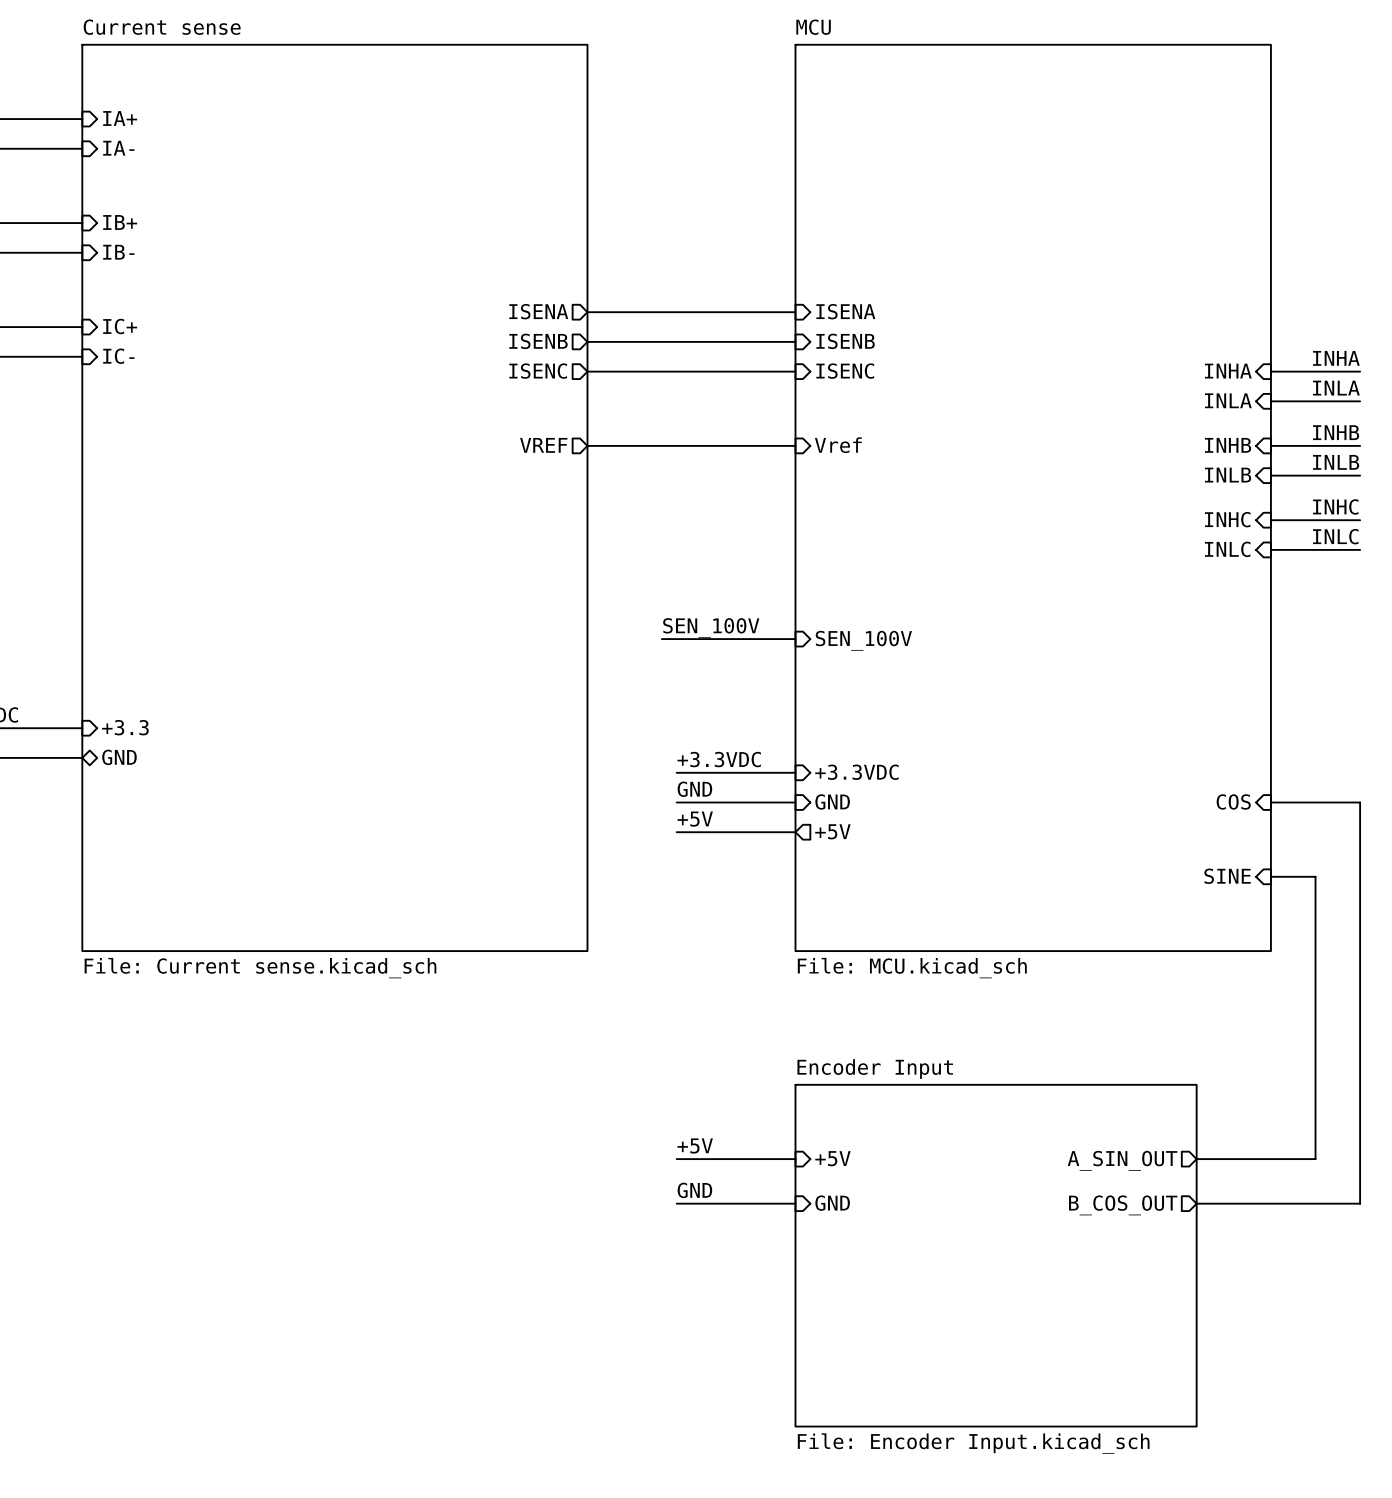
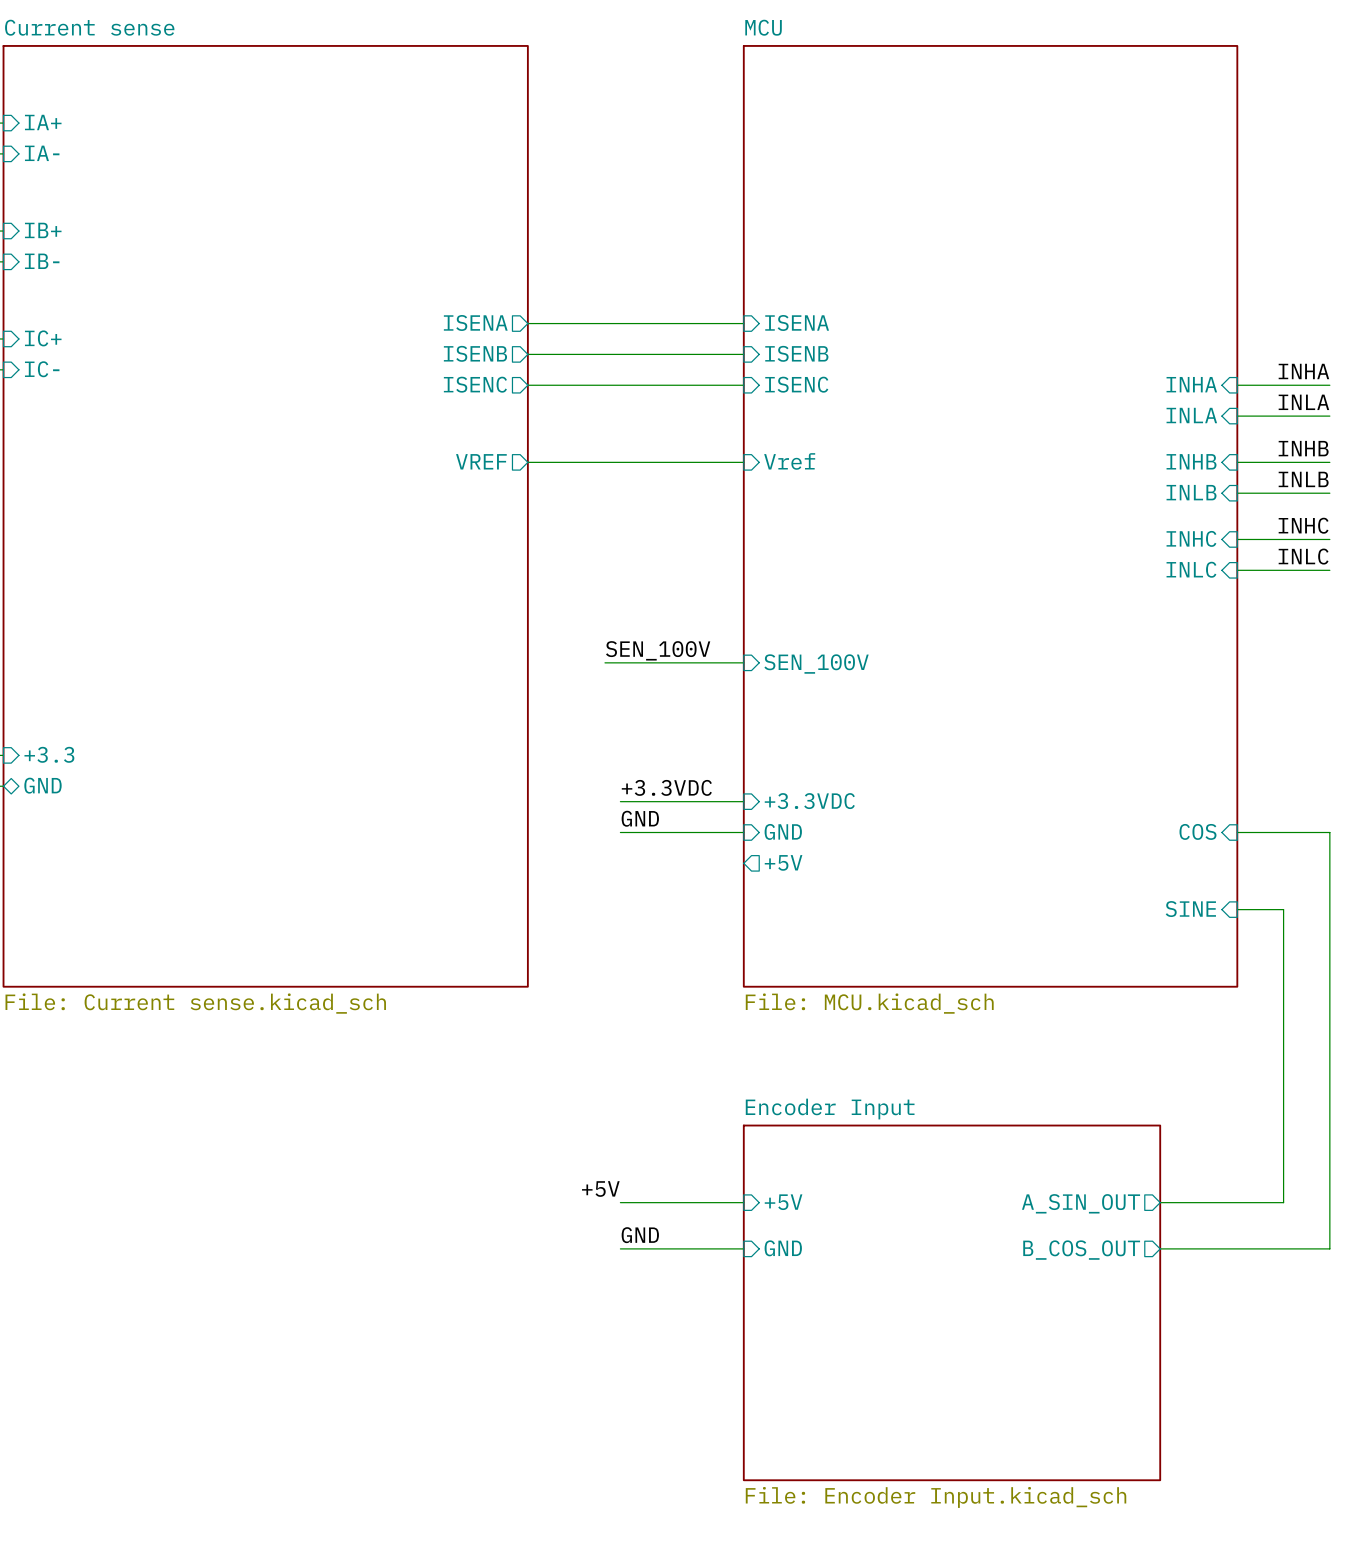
label: +5V (695, 819) -> none
wire: (676, 832) (795, 832) -> none
label position: +5V (695, 1145) -> +5V (600, 1189)

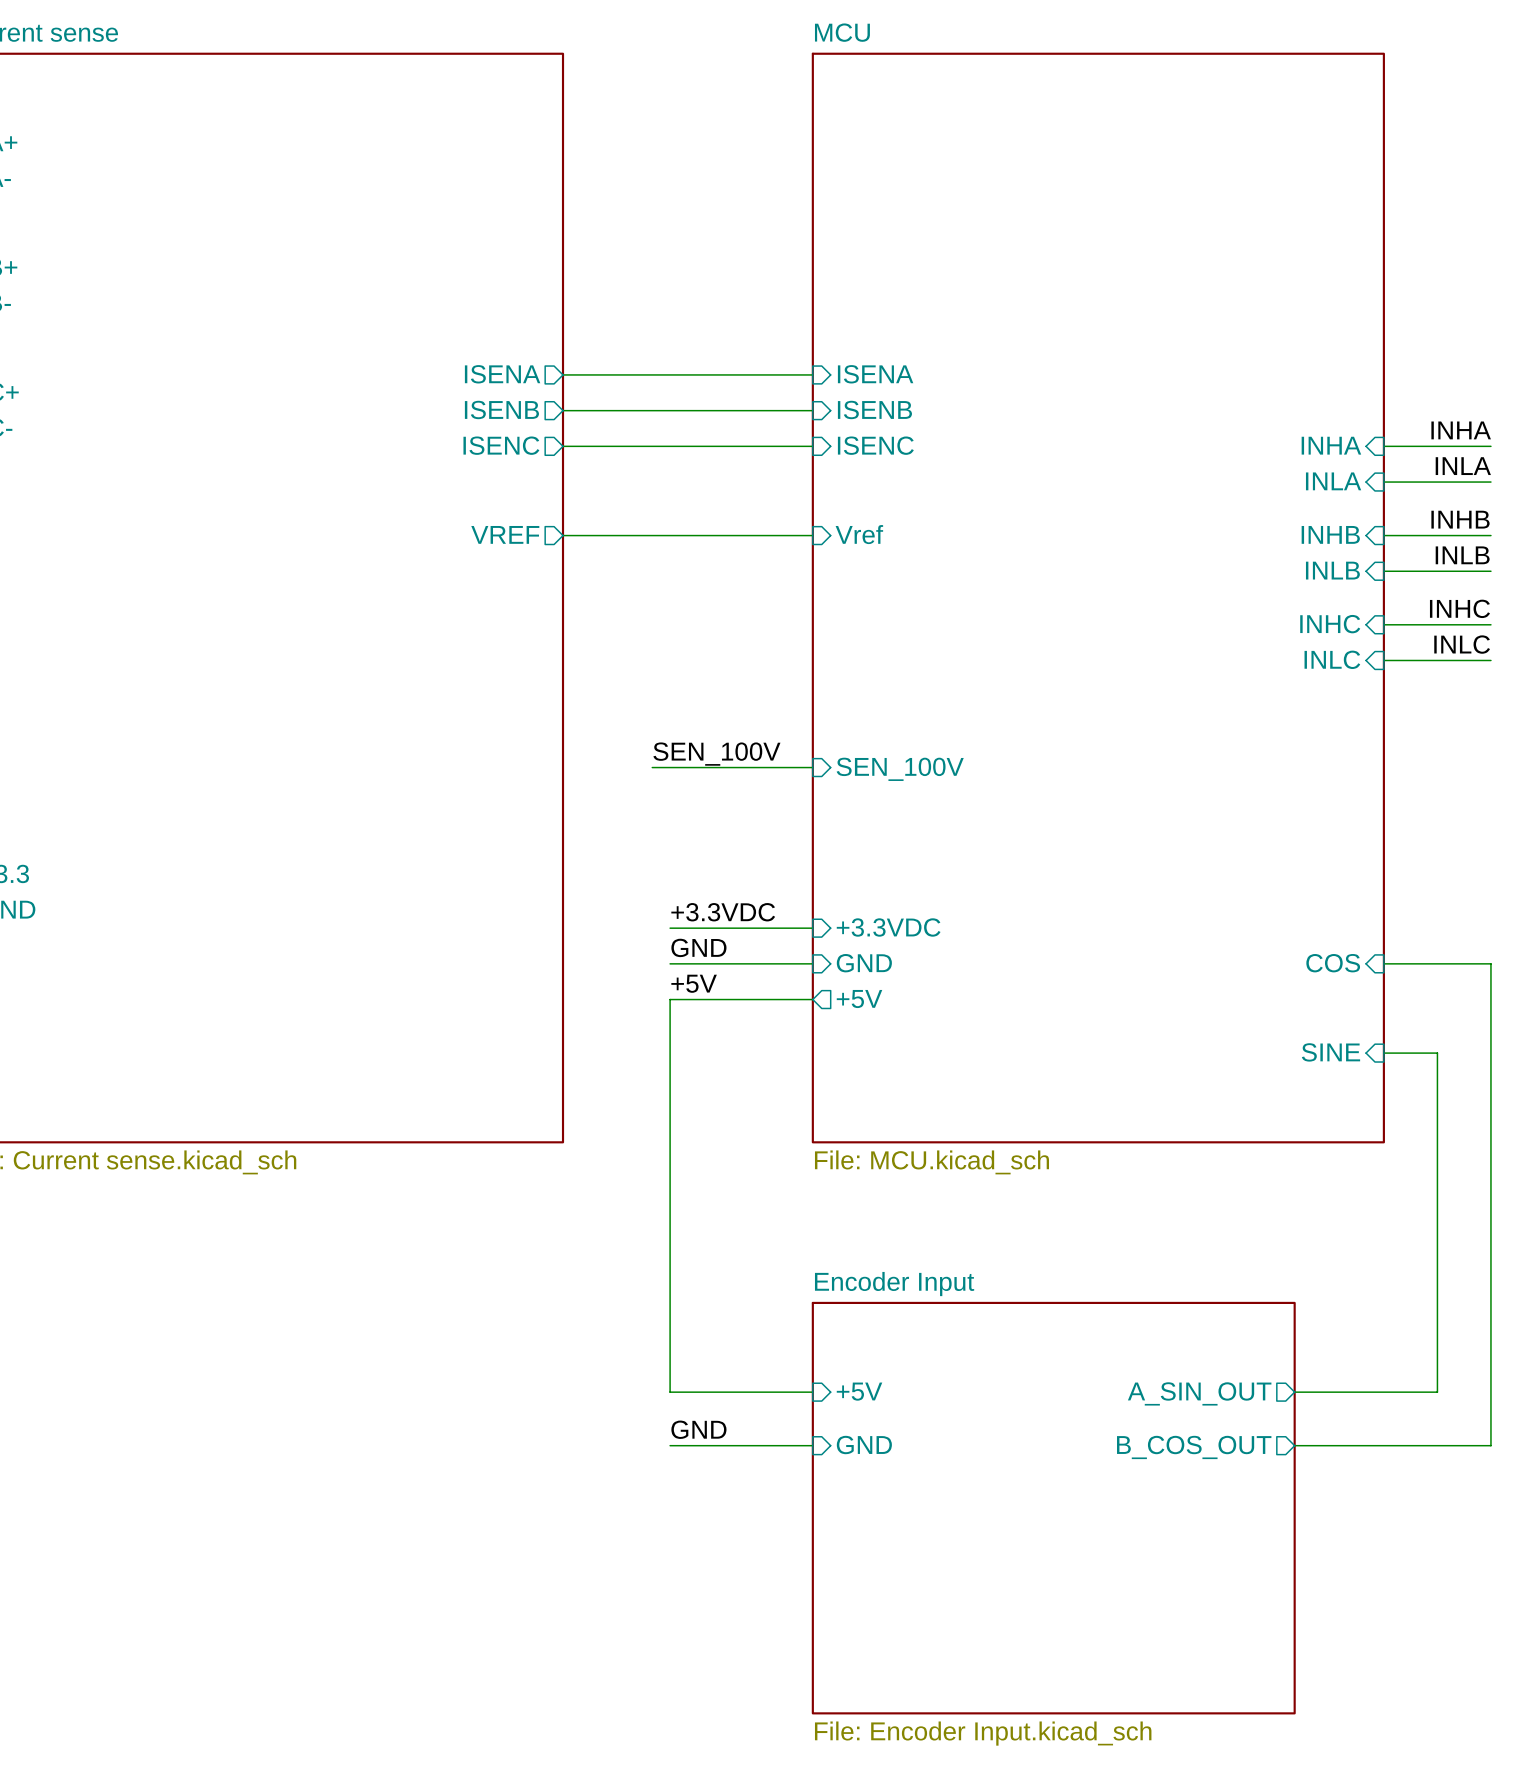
label: none -> +5V (694, 983)
wire: none -> (812, 999) (670, 999) (670, 1392)
label: +5V (600, 1189) -> none

